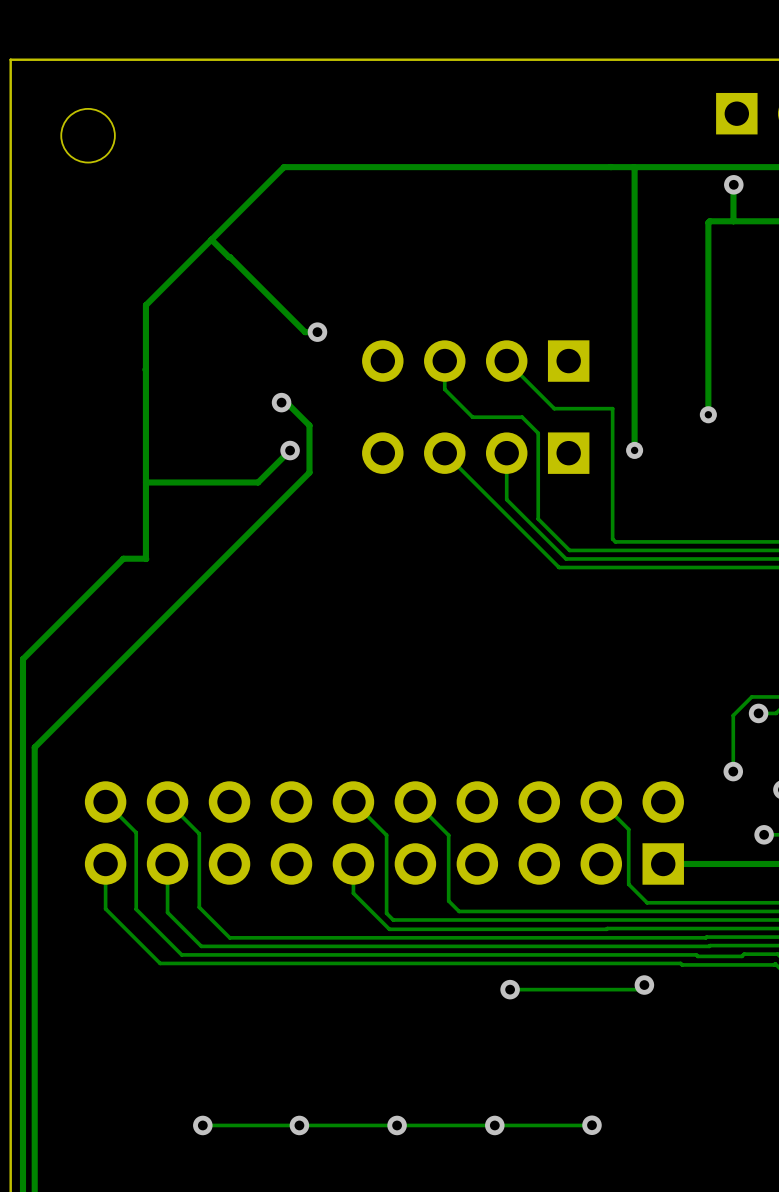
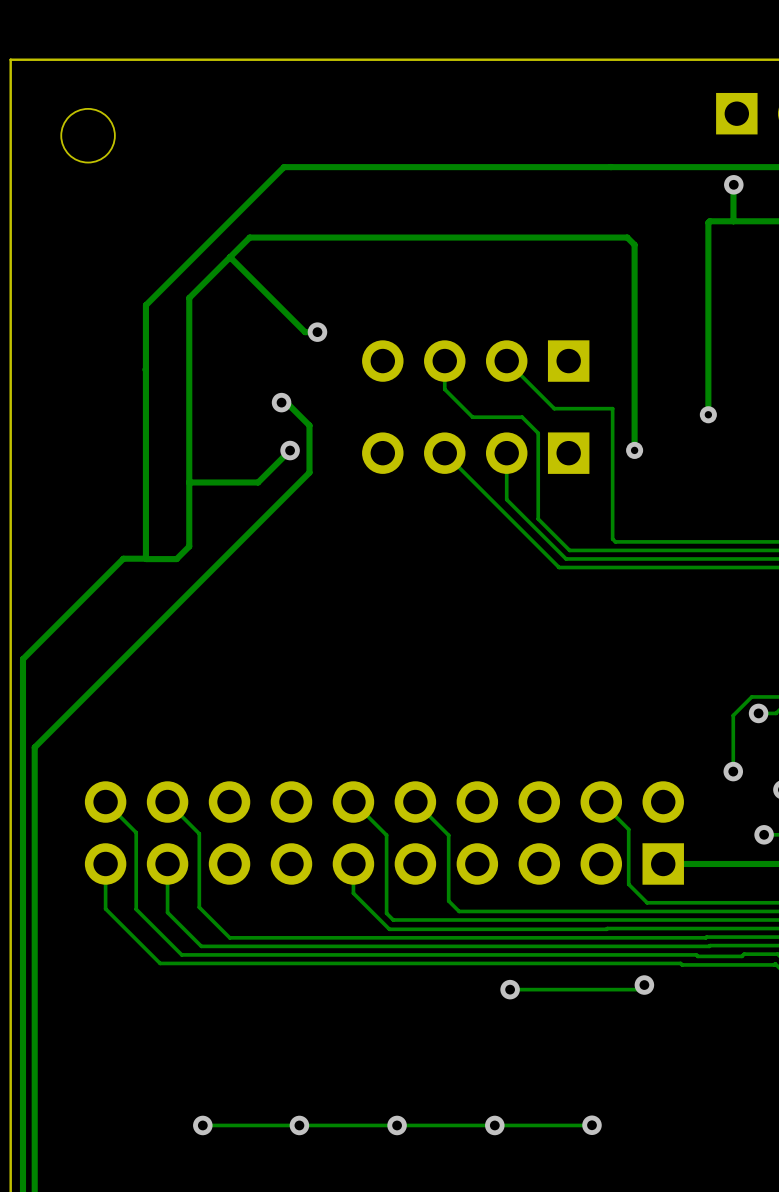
track: (633, 167) (634, 244) -> (146, 559) (176, 559) (189, 546) (189, 298) (249, 237) (627, 237) (634, 244)
track: (211, 239) (230, 257) -> none
track: (189, 482) (146, 482) -> none

